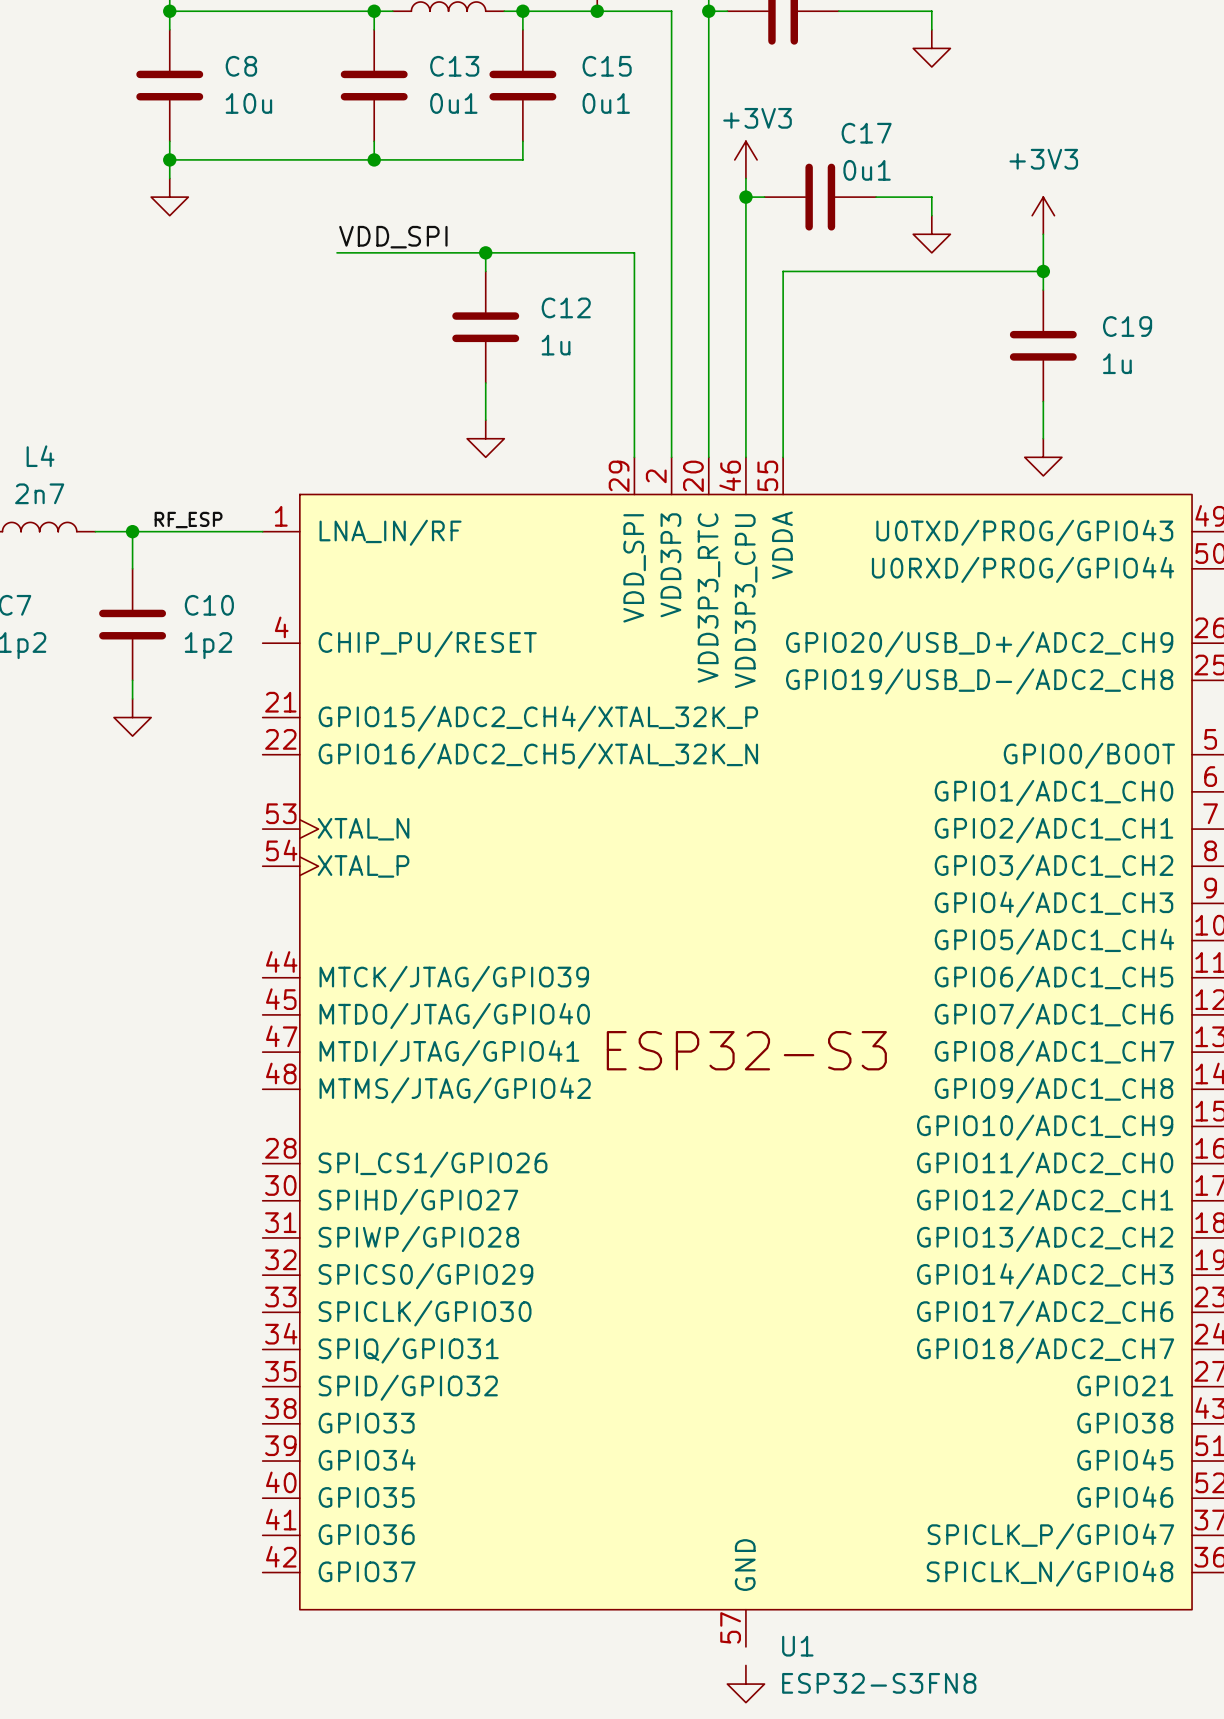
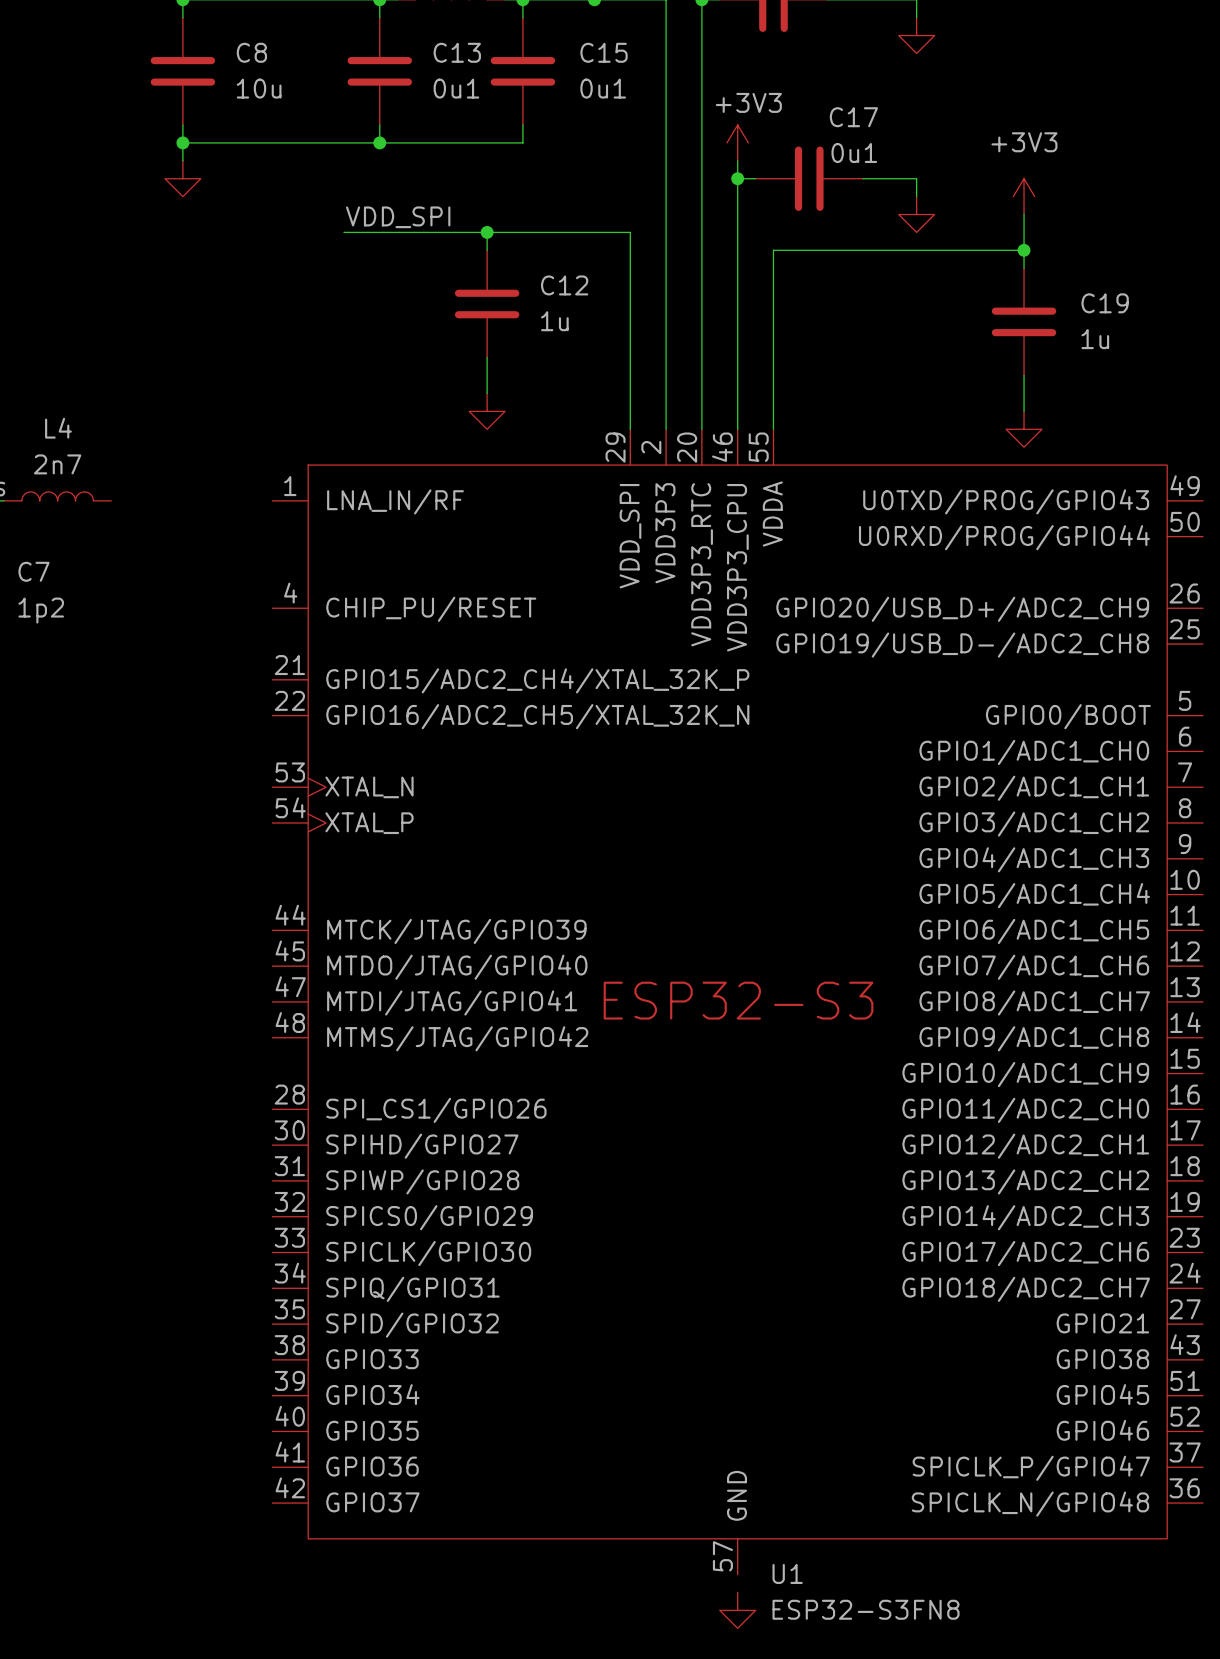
label: RF_ESP (188, 520) -> none
wire: (95, 531) (262, 531) -> none
wire: (132, 531) (132, 568) -> none
junction: (132, 531) -> none
C10: 1p2 (132, 624) -> none
wire: (132, 680) (132, 698) -> none
power symbol: (132, 717) -> none

